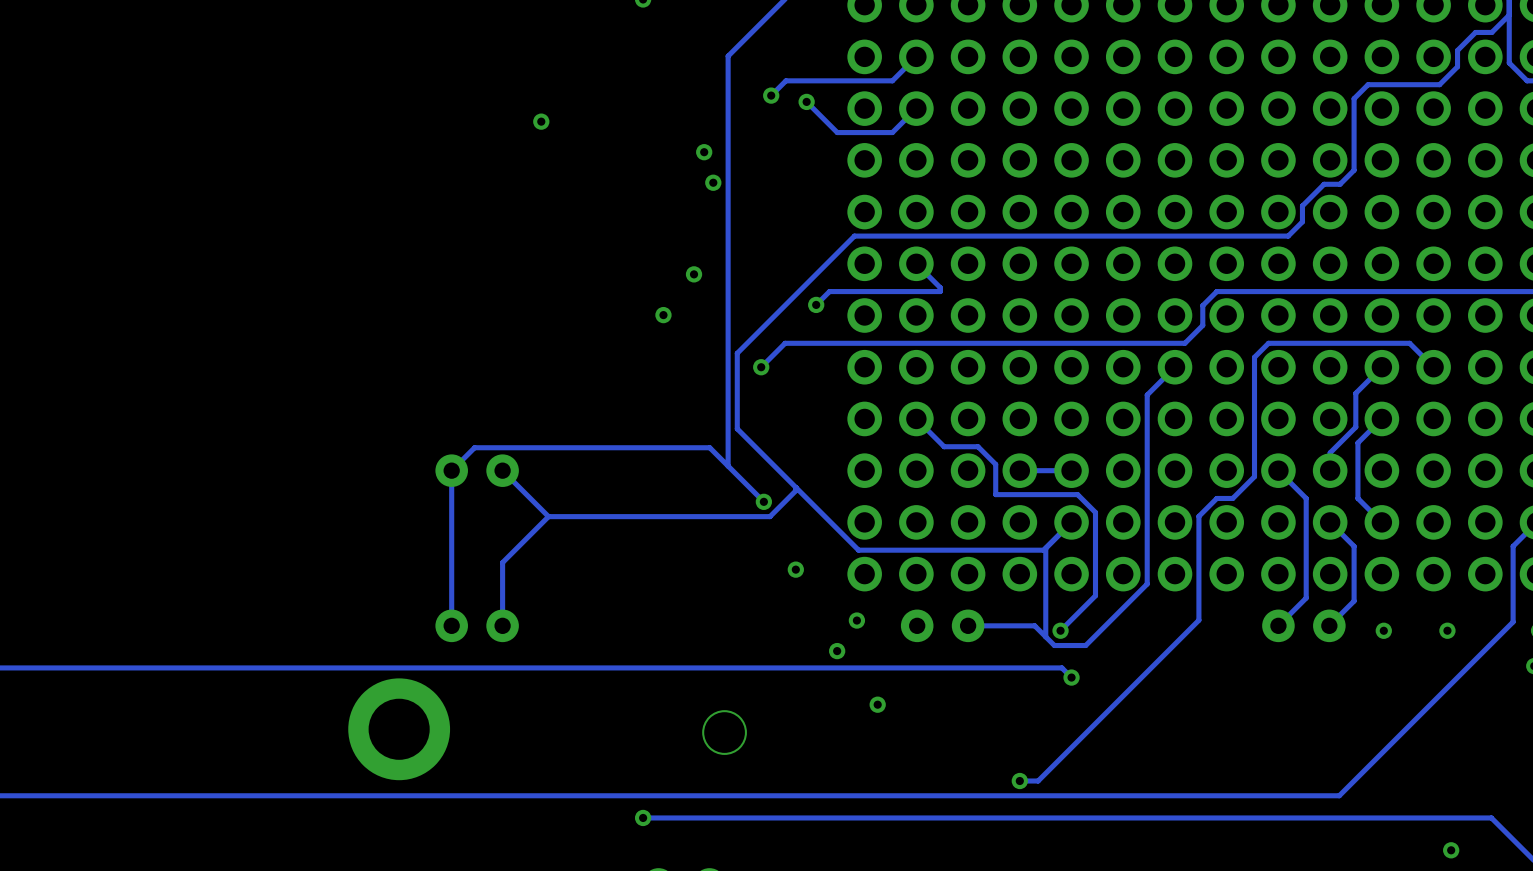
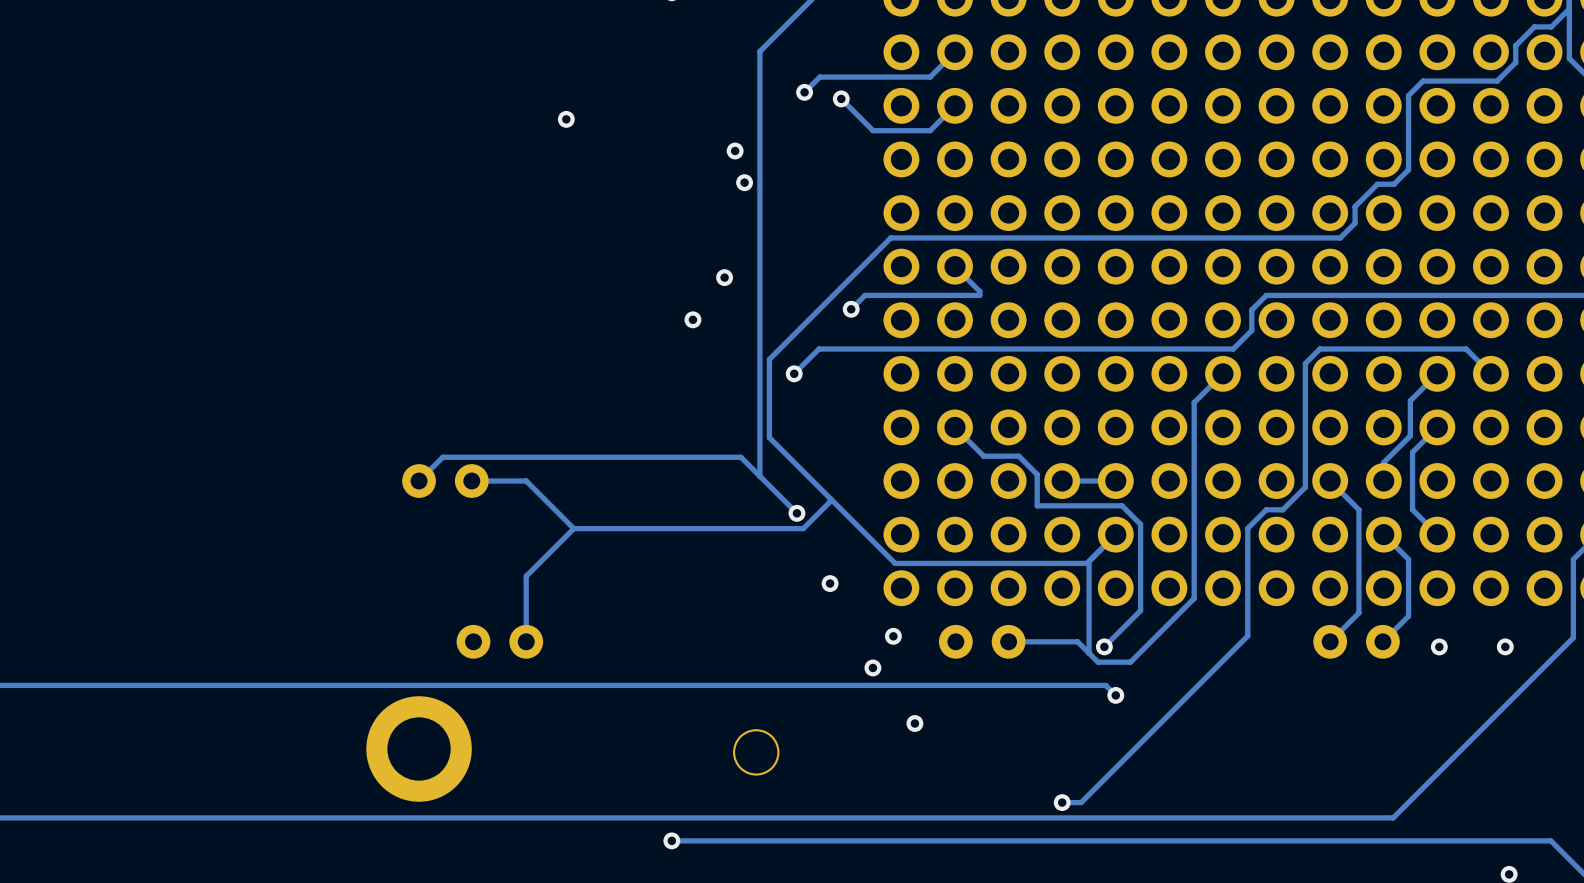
track: (474, 447) (451, 470) (451, 625) -> (497, 457) (442, 457) (419, 481)
part position: (477, 470) -> (445, 481)
track: none -> (526, 481) (471, 481)

